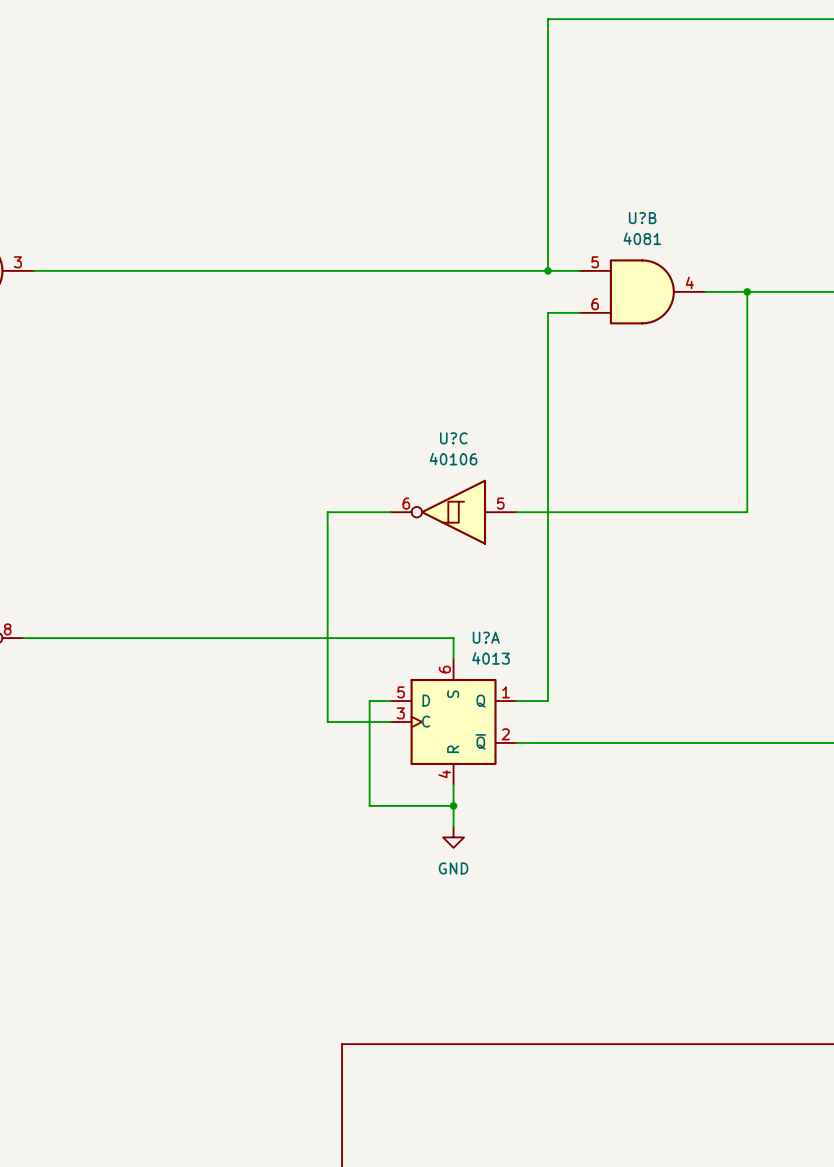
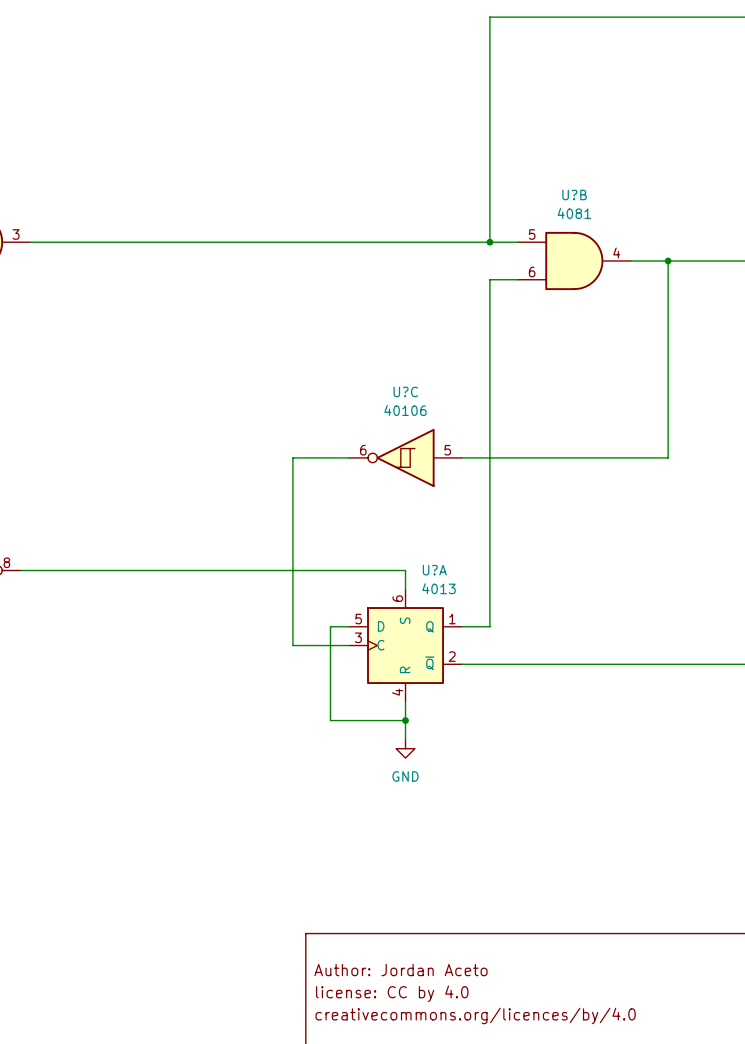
title block: none -> Author: Jordan Aceto (400, 970)
title block: none -> license: CC by 4.0 (392, 993)
title block: none -> creativecommons.org/licences/by/4.0 (475, 1015)

